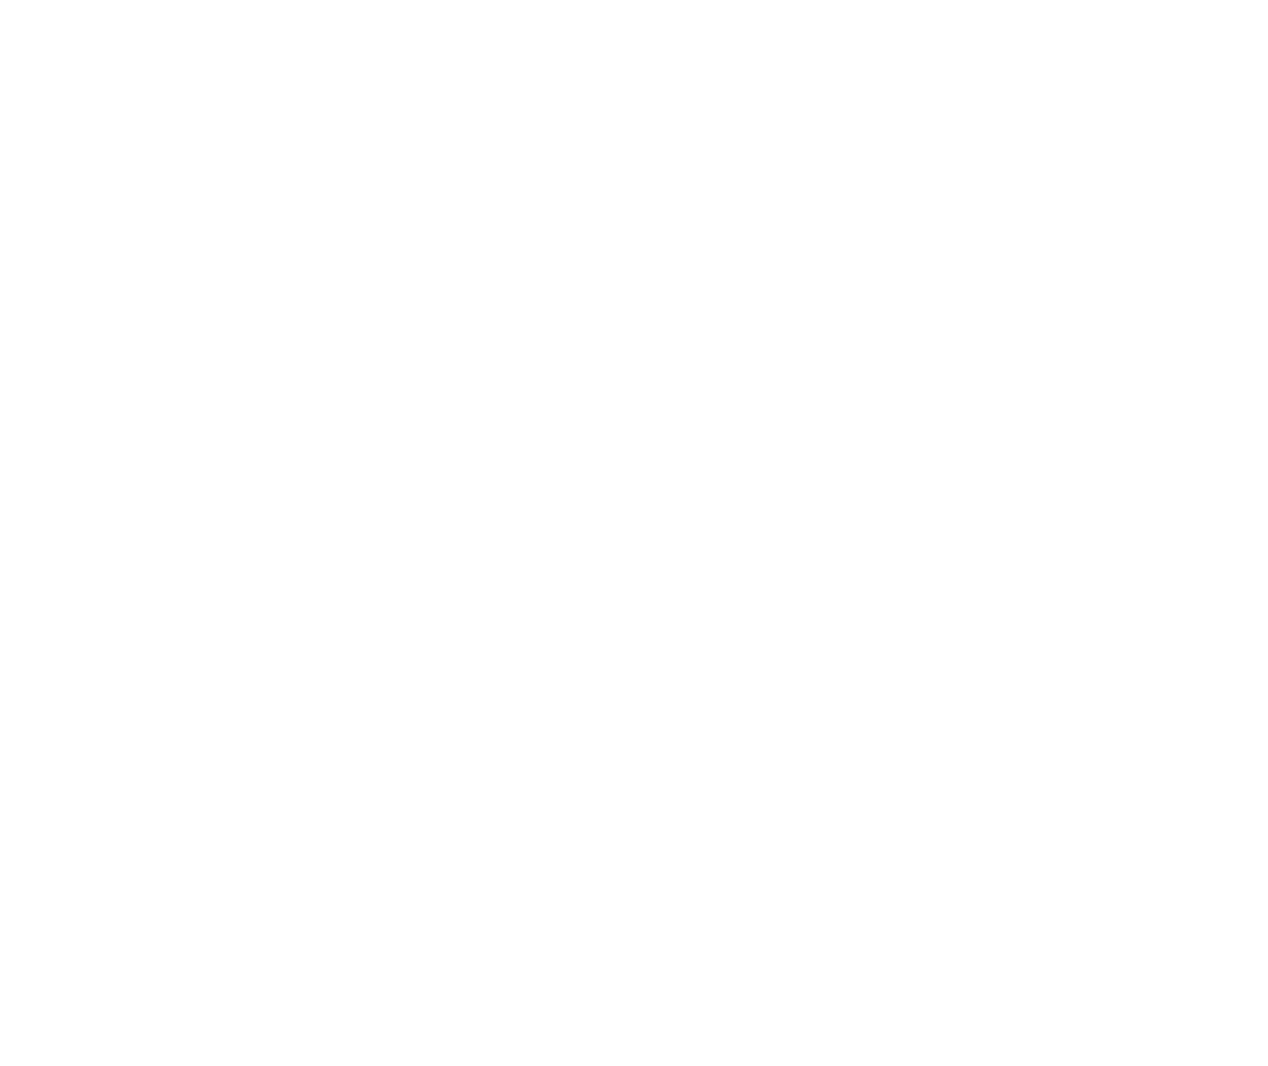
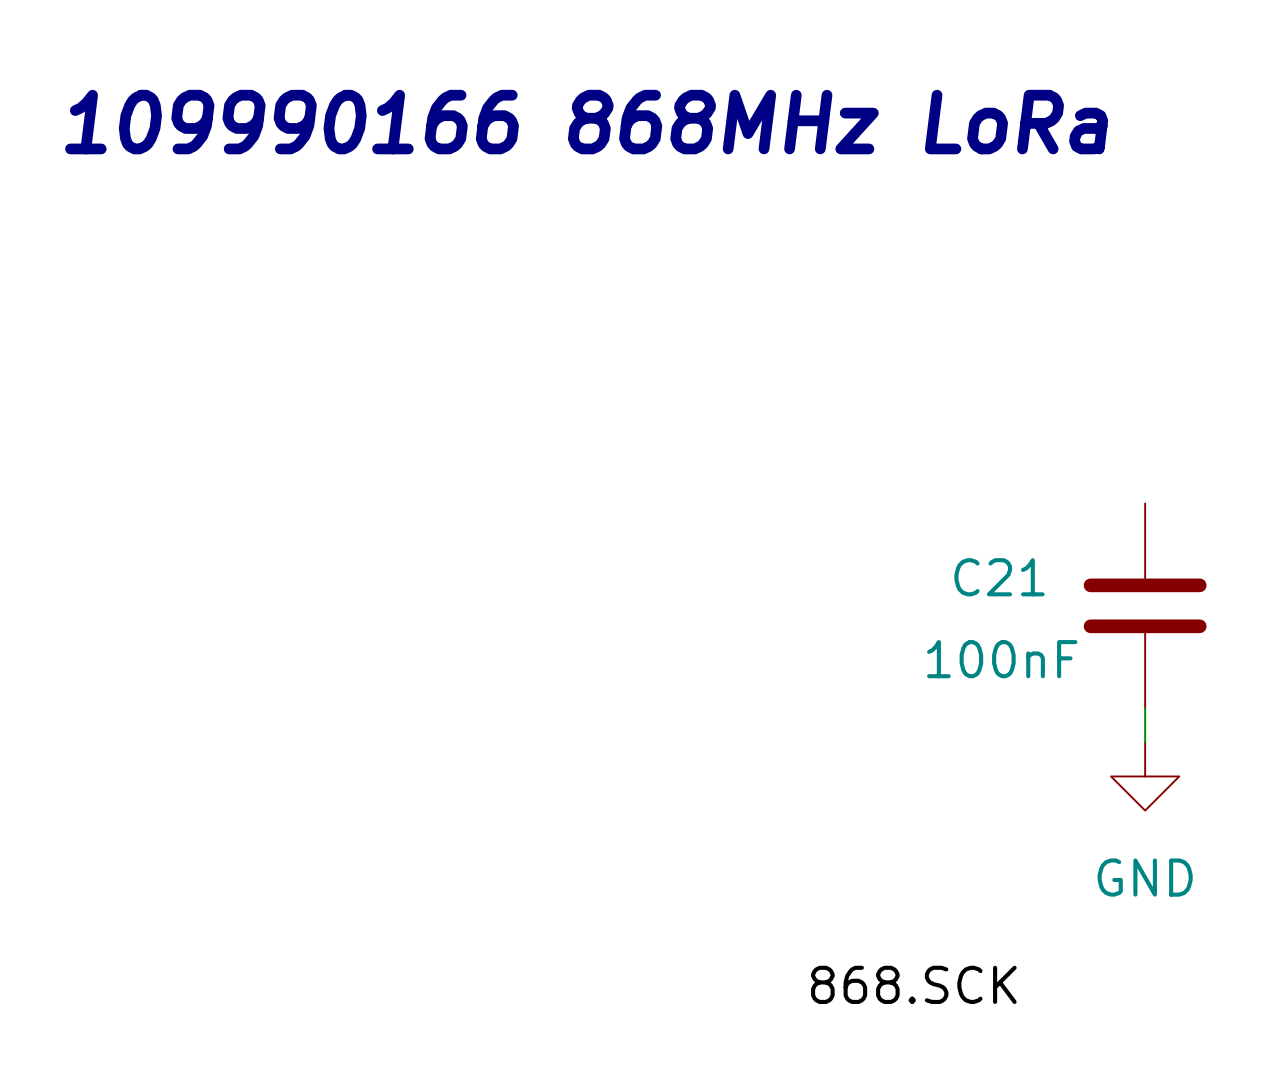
text: none -> 109990166 868MHz LoRa (586, 122)
C21: none -> 100nF (1145, 605)
wire: none -> (1145, 708) (1145, 742)
power symbol: none -> GND (1145, 776)
label: none -> 868.SCK (913, 984)

